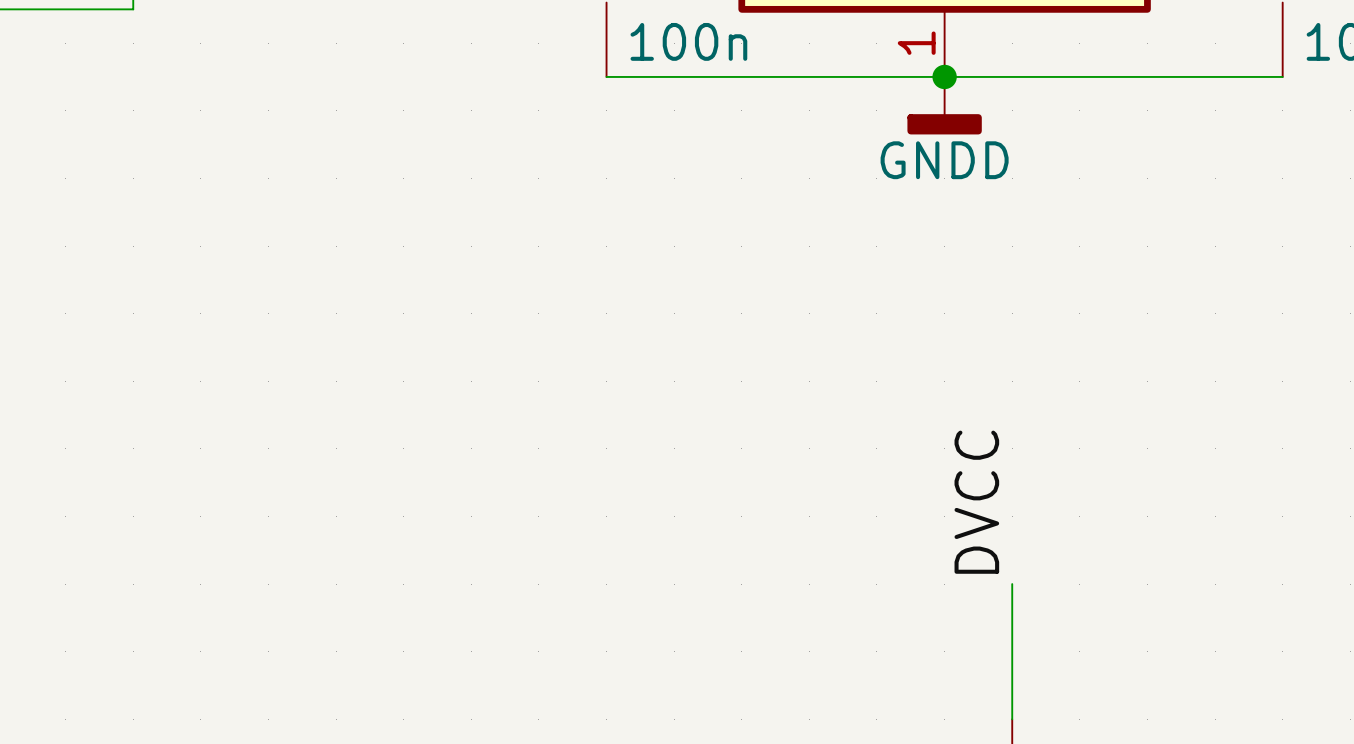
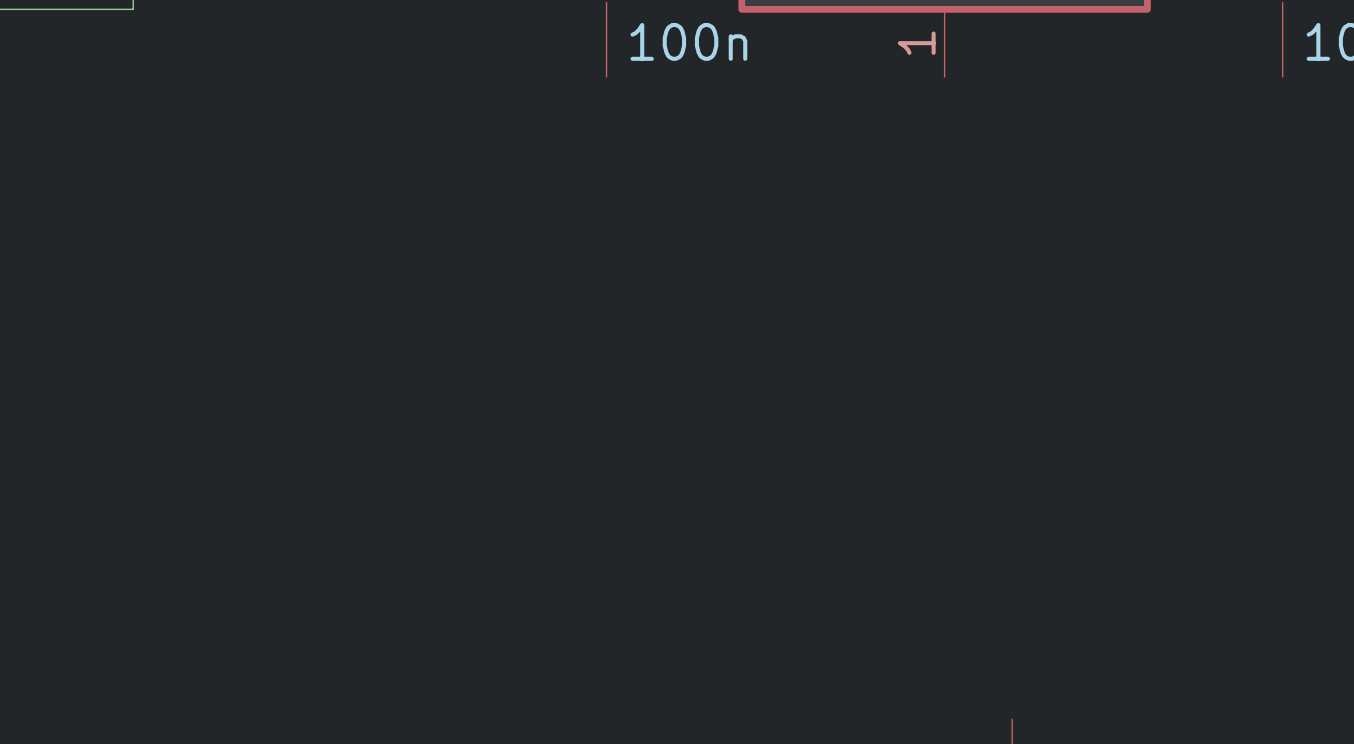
wire: (606, 76) (1282, 76) -> none
junction: (944, 76) -> none
power symbol: GNDD (944, 105) -> none
label: DVCC (976, 502) -> none
wire: (1012, 584) (1012, 719) -> none

